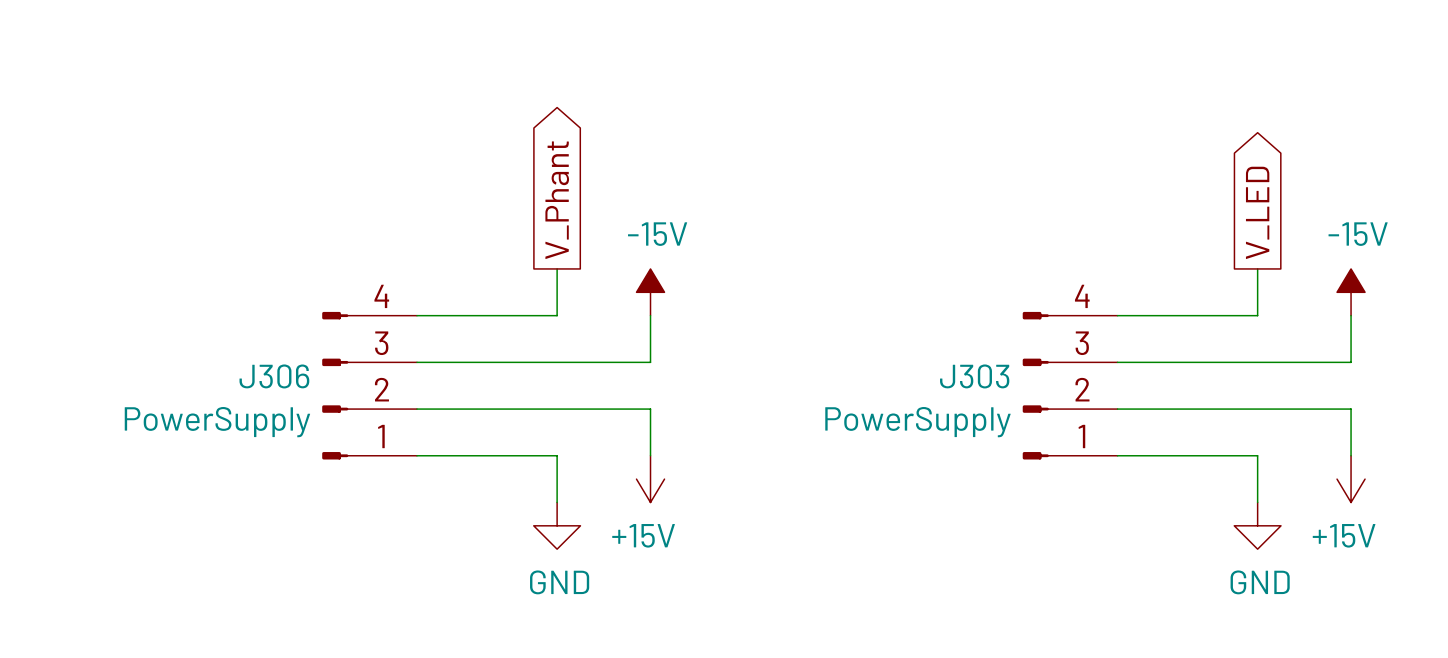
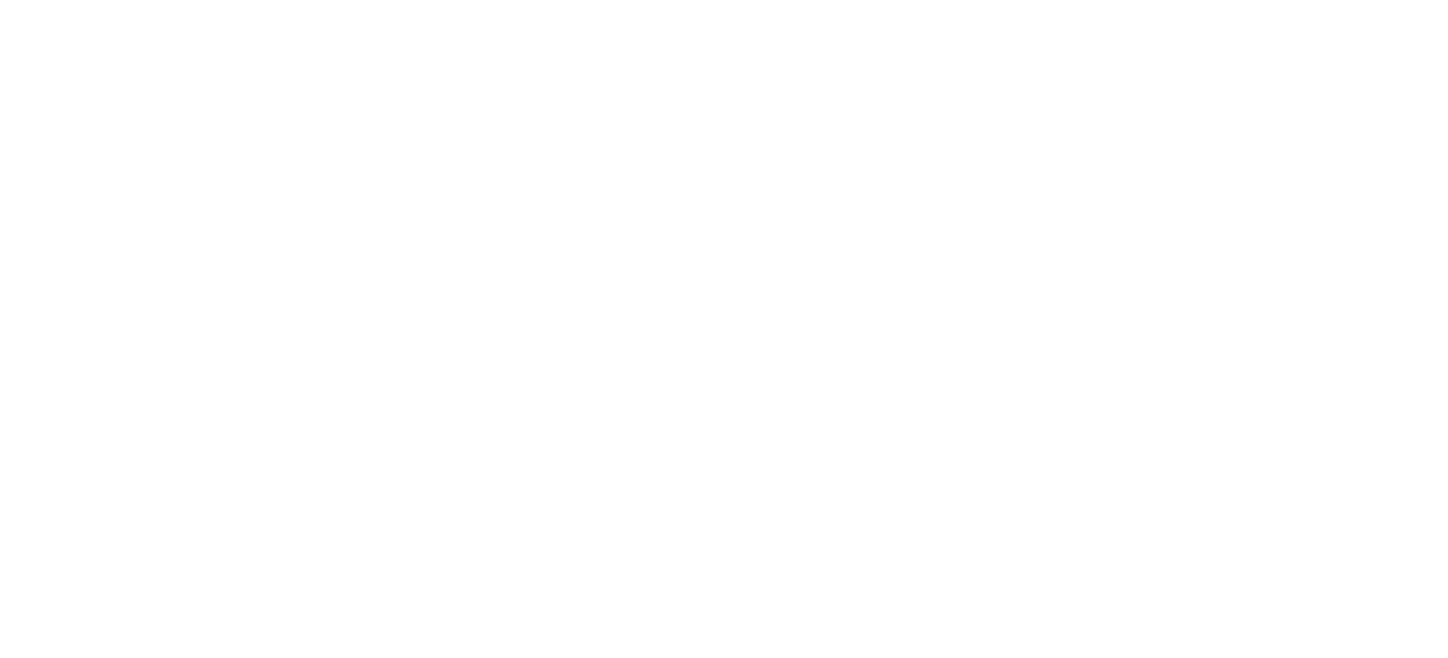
global label: V_Phant (557, 200) -> none
global label: V_LED (1257, 212) -> none
wire: (557, 268) (557, 315) (417, 315) -> none
wire: (1257, 268) (1257, 315) (1117, 315) -> none
power symbol: -15V (650, 292) -> none
power symbol: -15V (1351, 292) -> none
wire: (650, 315) (650, 362) (417, 362) -> none
wire: (1351, 315) (1351, 362) (1117, 362) -> none
J306: PowerSupply (369, 385) -> none
J303: PowerSupply (1070, 385) -> none
wire: (417, 409) (650, 409) (650, 455) -> none
wire: (1117, 409) (1351, 409) (1351, 455) -> none
wire: (417, 455) (557, 455) (557, 502) -> none
wire: (1117, 455) (1257, 455) (1257, 502) -> none
power symbol: +15V (650, 479) -> none
power symbol: +15V (1351, 479) -> none
power symbol: GND (557, 525) -> none
power symbol: GND (1257, 525) -> none

